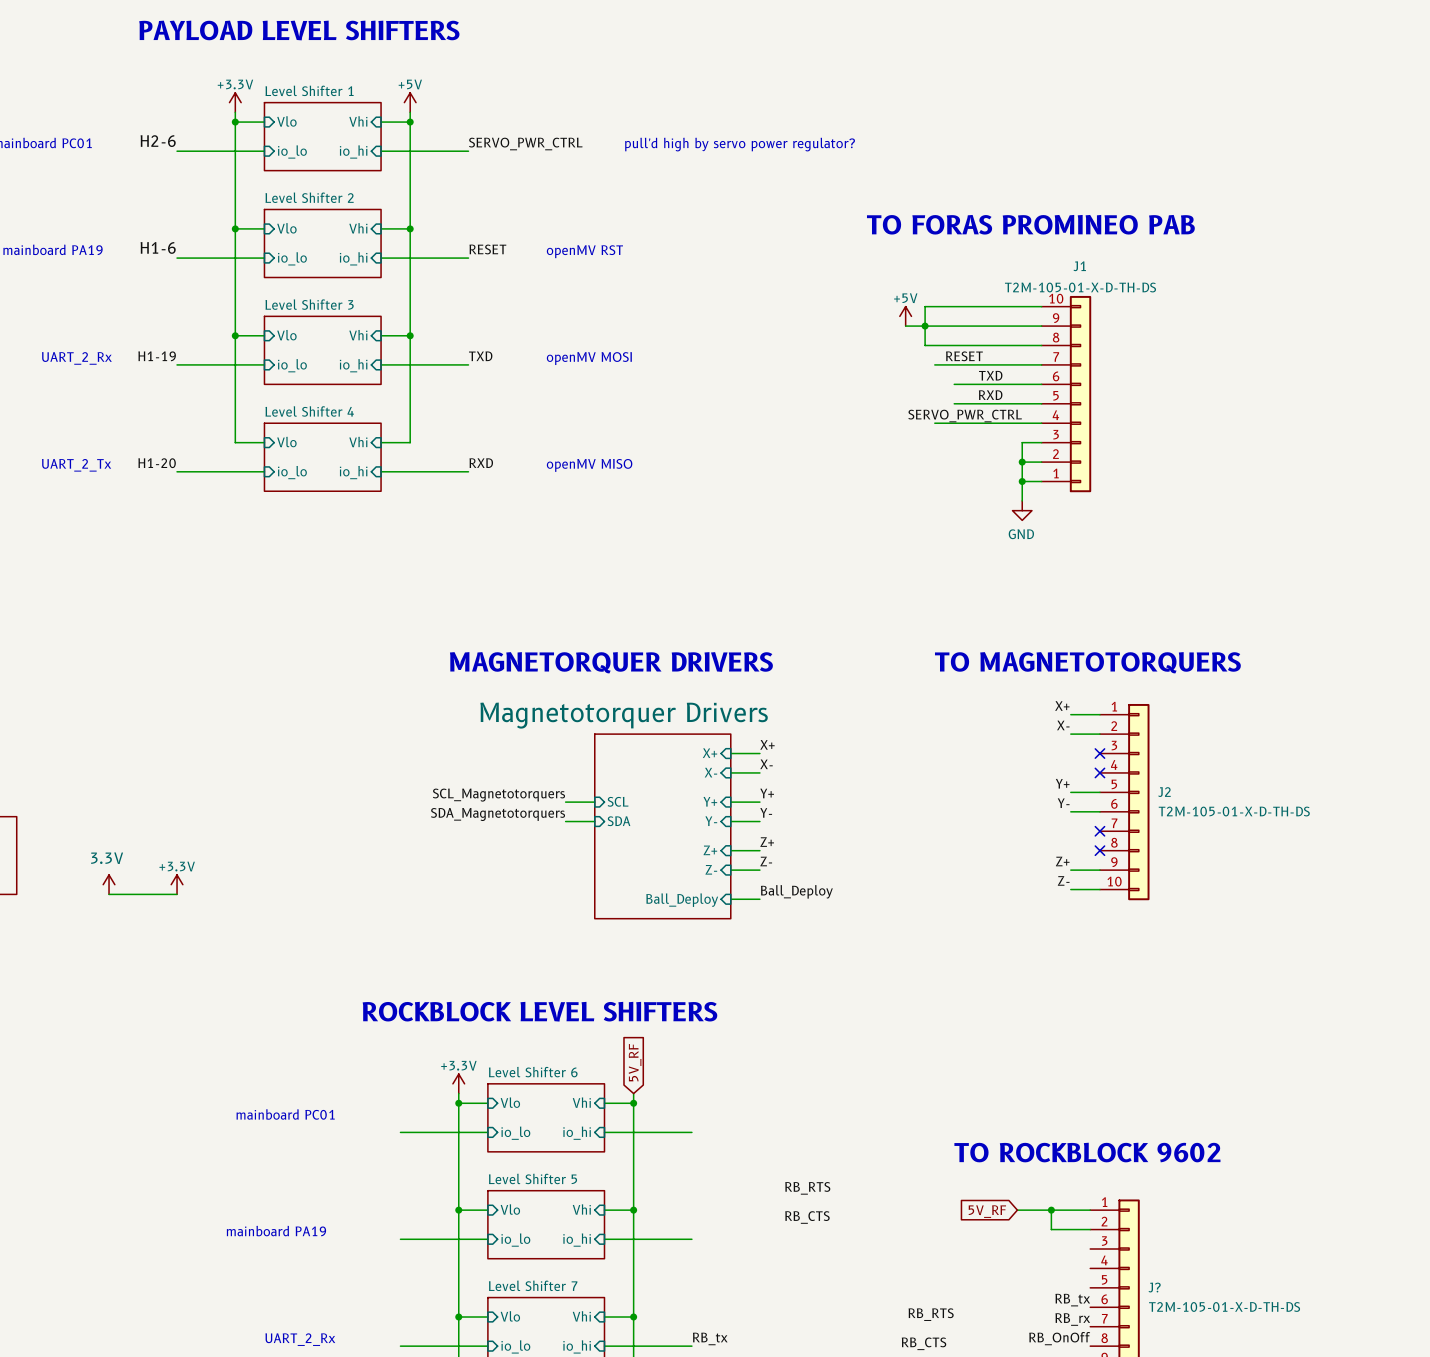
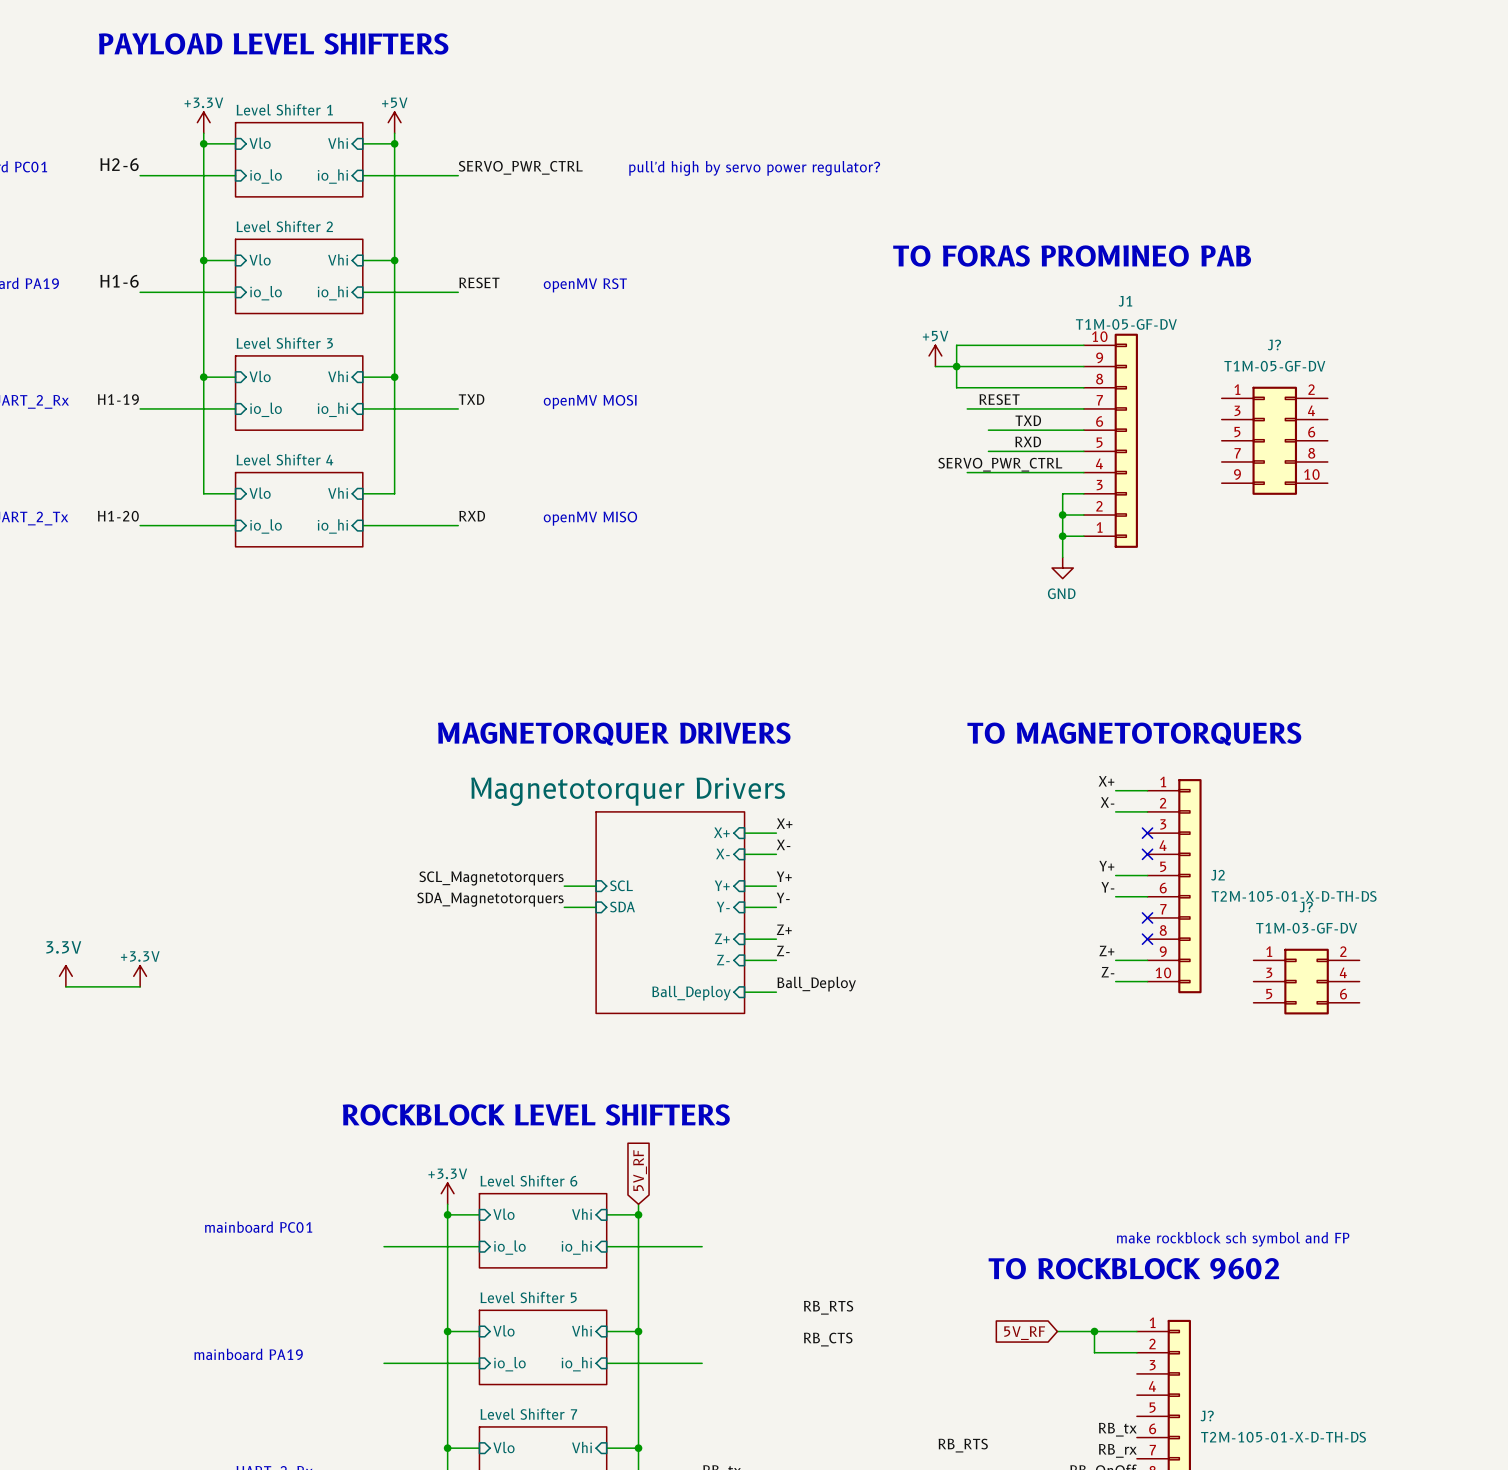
J1 value: T2M-105-01-X-D-TH-DS (1080, 287) -> T1M-05-GF-DV (1126, 324)
J?: none -> T1M-05-GF-DV (1274, 440)
J?: none -> T1M-03-GF-DV (1306, 981)
text: none -> make rockblock sch symbol and FP (1233, 1239)

